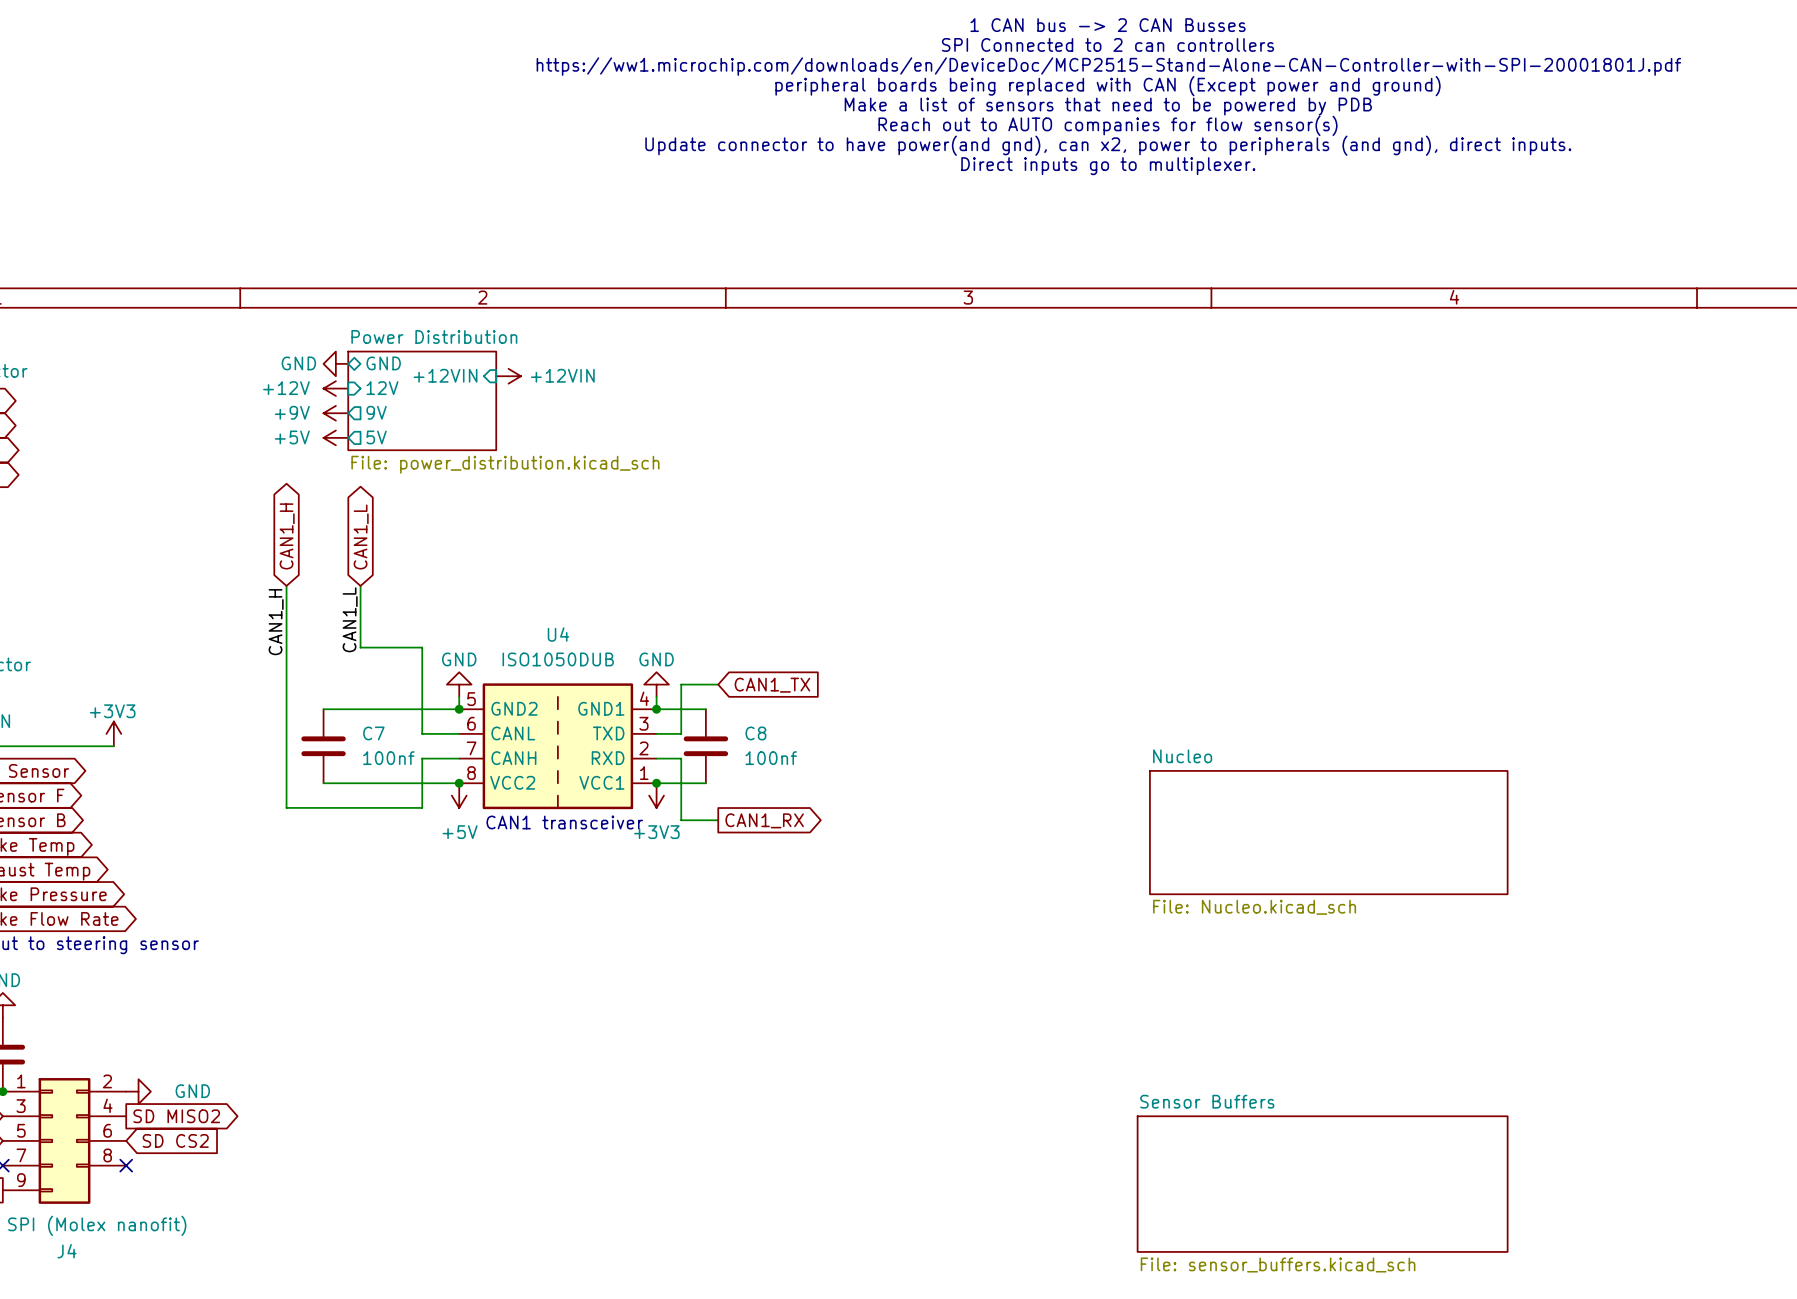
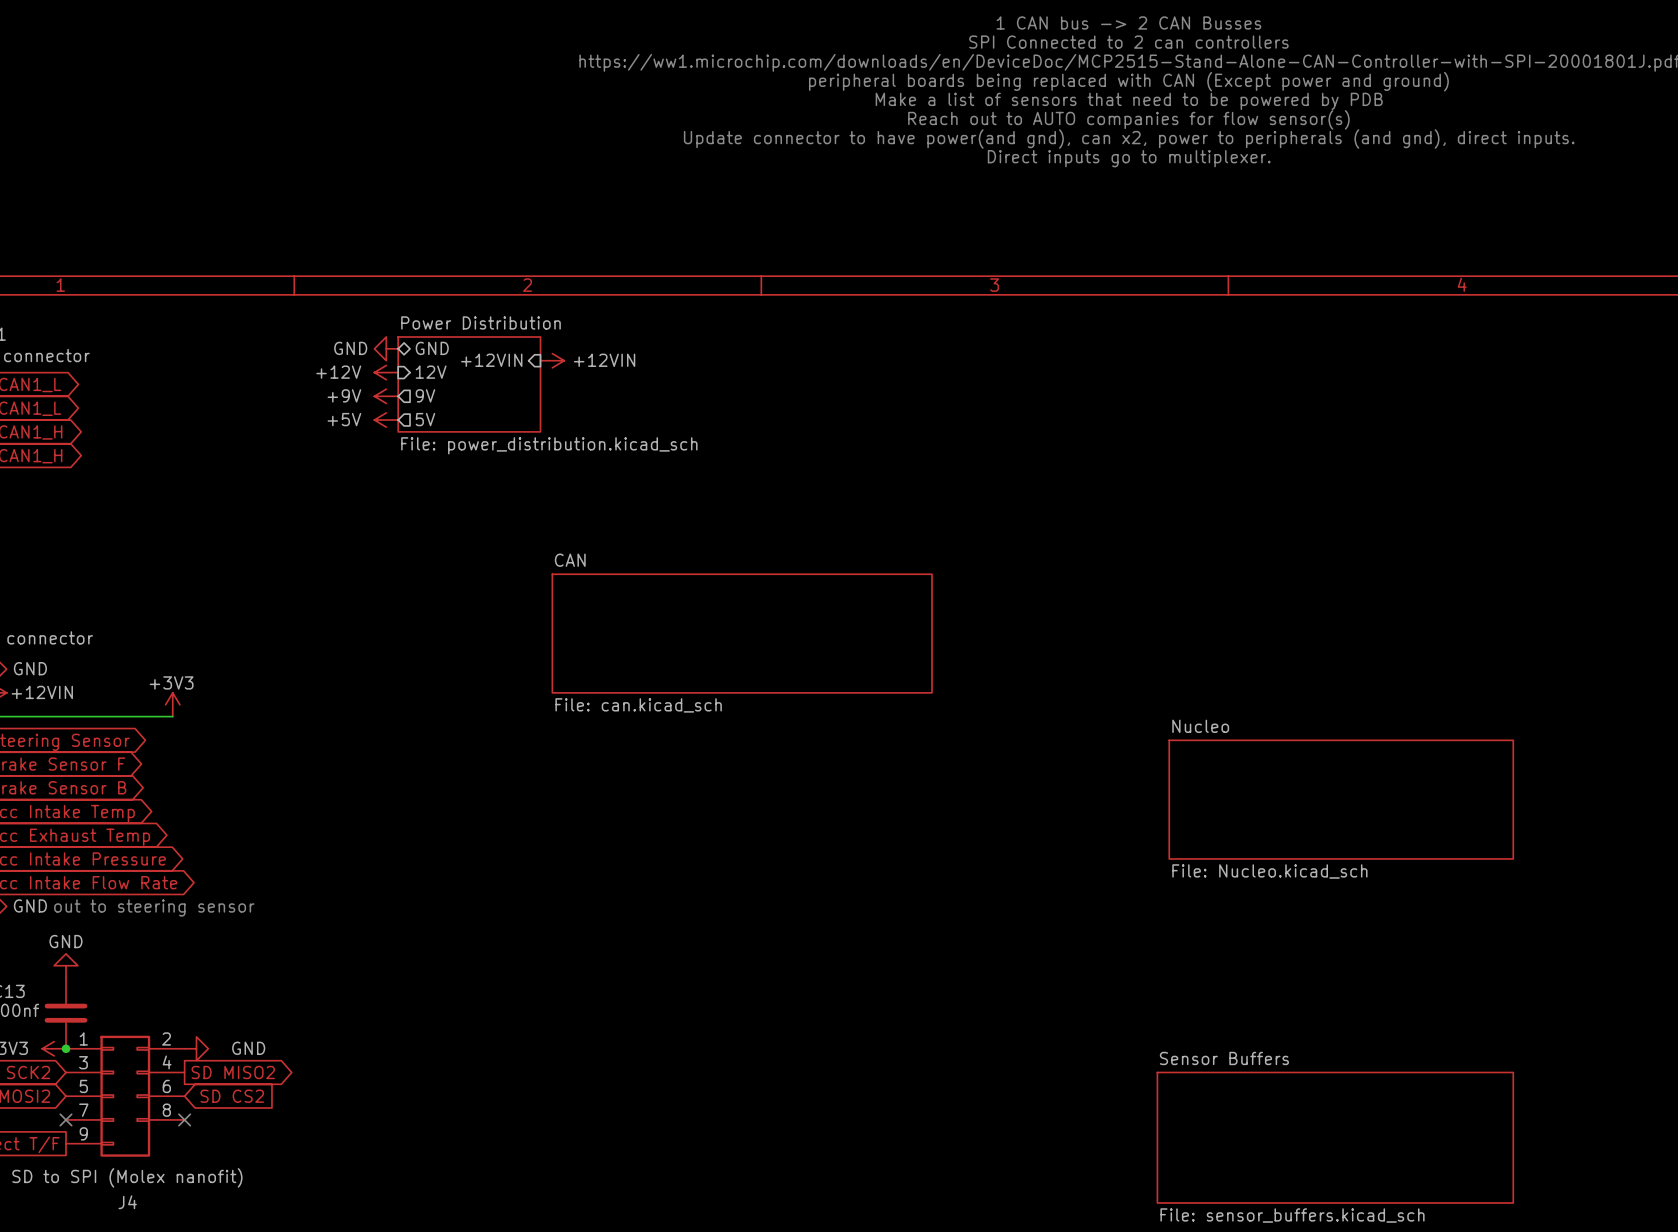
global label: CAN1_H (287, 536) -> none
global label: CAN1_L (361, 537) -> none
wire: (286, 585) (286, 807) (422, 807) (422, 758) (459, 758) -> none
wire: (360, 585) (360, 647) (422, 647) (422, 733) (459, 733) -> none
label: CAN1_L (350, 619) -> none
label: CAN1_H (276, 622) -> none
sheet CAN: none -> File: can.kicad_sch (742, 633)
power symbol: GND (459, 684) -> none
power symbol: GND (656, 684) -> none
wire: (718, 684) (681, 684) (681, 733) (656, 733) -> none
global label: CAN1_TX (772, 685) -> none
wire: (459, 696) (459, 709) (323, 709) -> none
wire: (656, 696) (656, 709) (705, 709) -> none
junction: (459, 709) -> none
junction: (656, 709) -> none
C7: 100nf (323, 746) -> none
U4: ISO1050DUB (557, 746) -> none
C8: 100nf (705, 746) -> none
wire: (656, 758) (681, 758) (681, 820) (718, 820) -> none
wire: (323, 783) (459, 783) -> none
junction: (459, 783) -> none
wire: (656, 783) (705, 783) -> none
junction: (656, 783) -> none
power symbol: +5V (459, 795) -> none
power symbol: +3V3 (656, 795) -> none
global label: CAN1_RX (764, 820) -> none
text: CAN1 transceiver (564, 822) -> none

